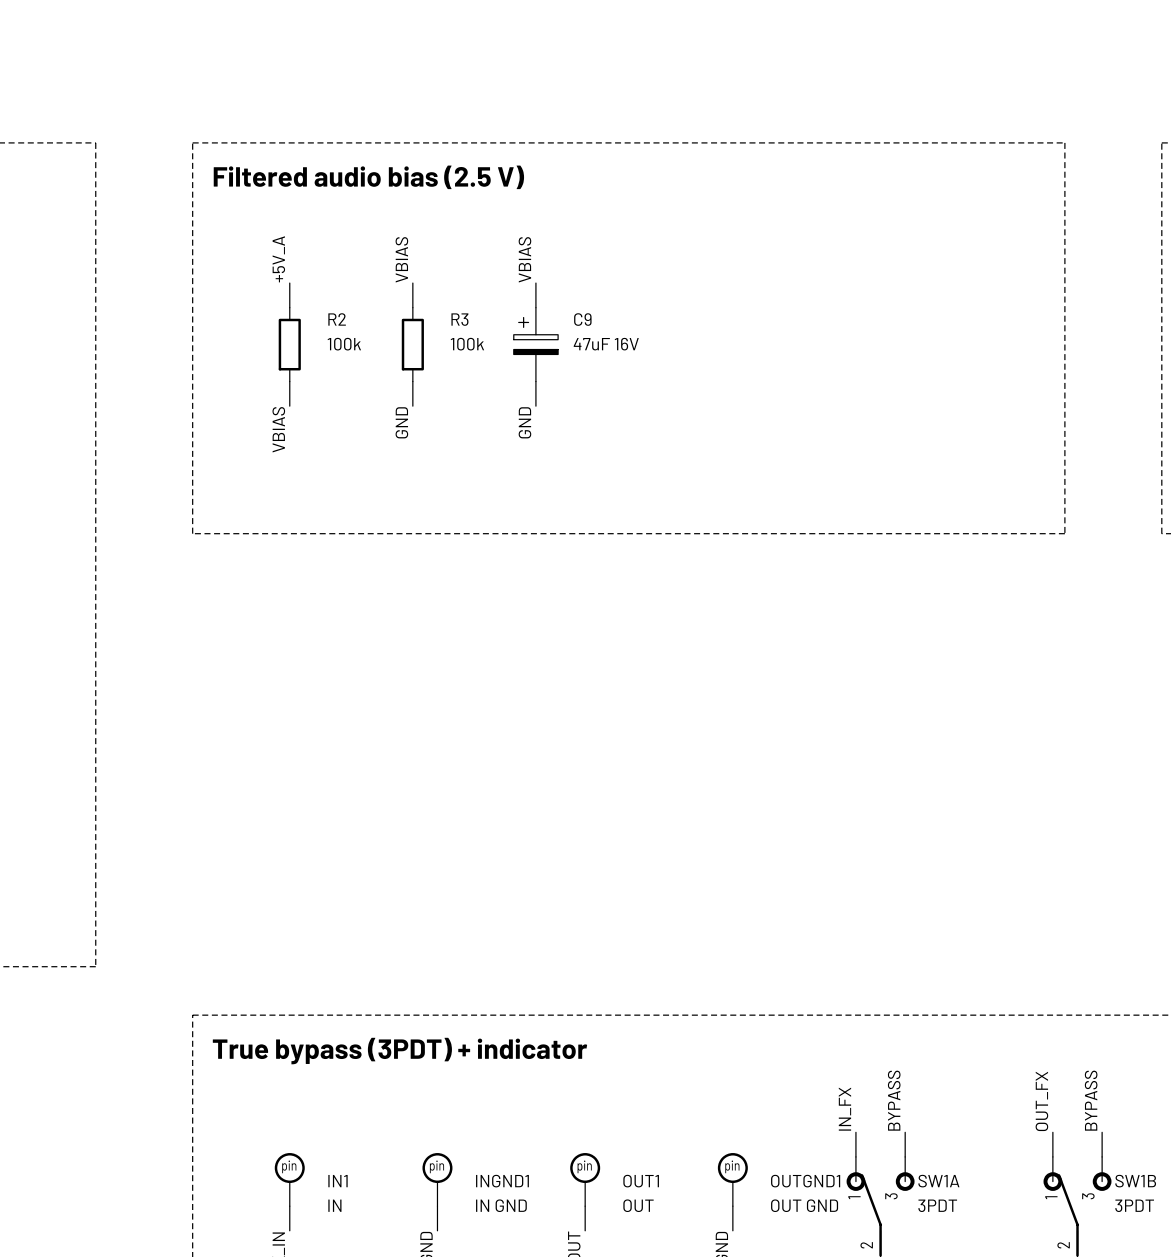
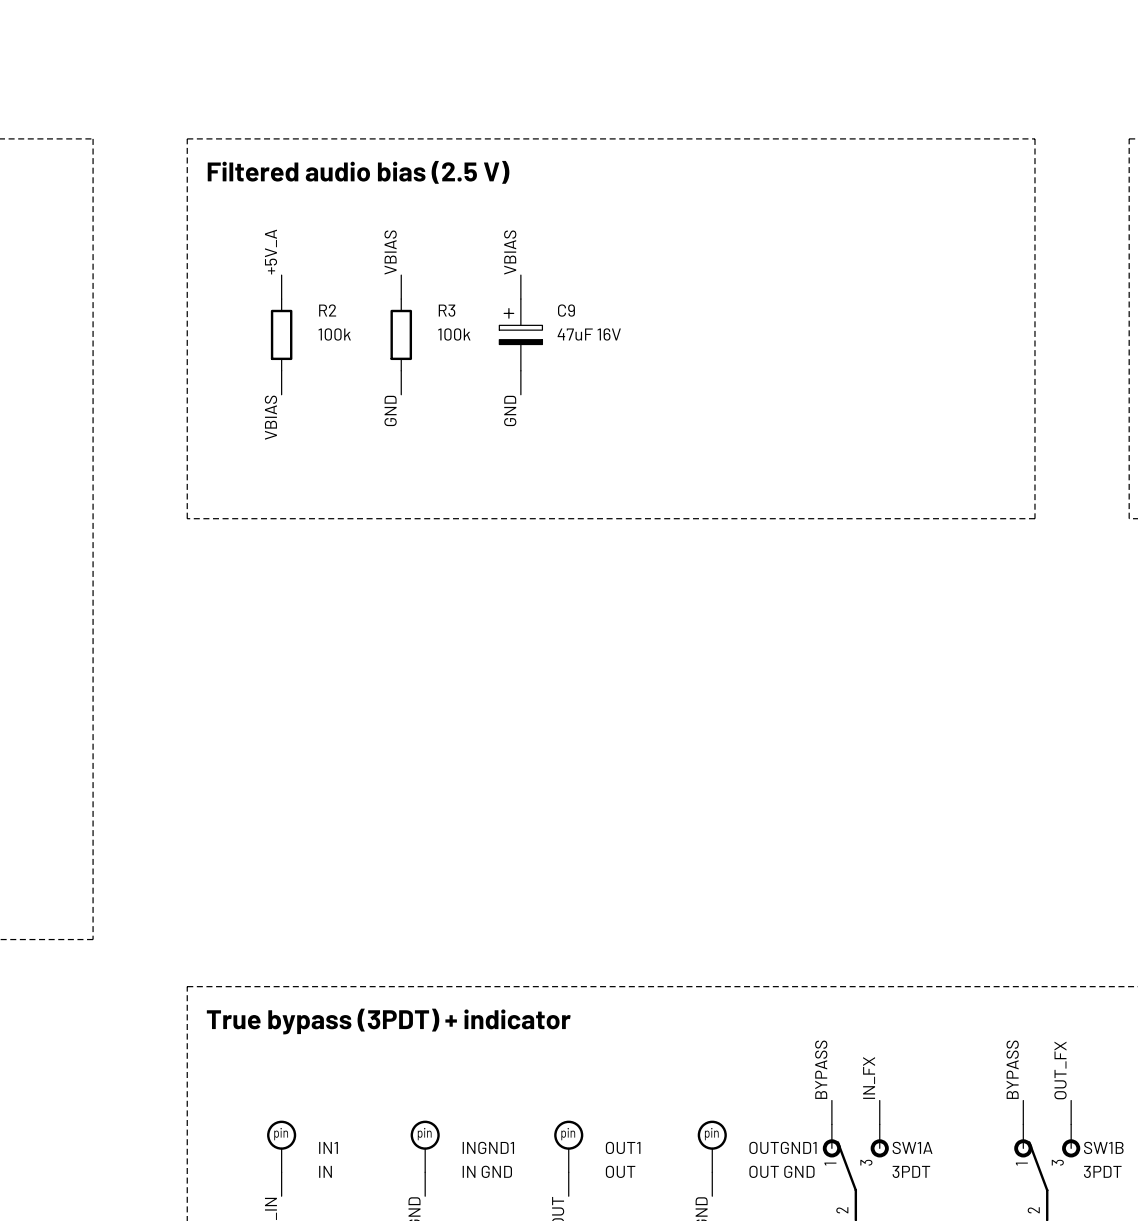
label: BYPASS (894, 1100) -> IN_FX (869, 1078)
label: BYPASS (1091, 1100) -> OUT_FX (1060, 1070)
label: OUT_FX (1041, 1101) -> BYPASS (1012, 1069)
label: IN_FX (844, 1109) -> BYPASS (821, 1069)

